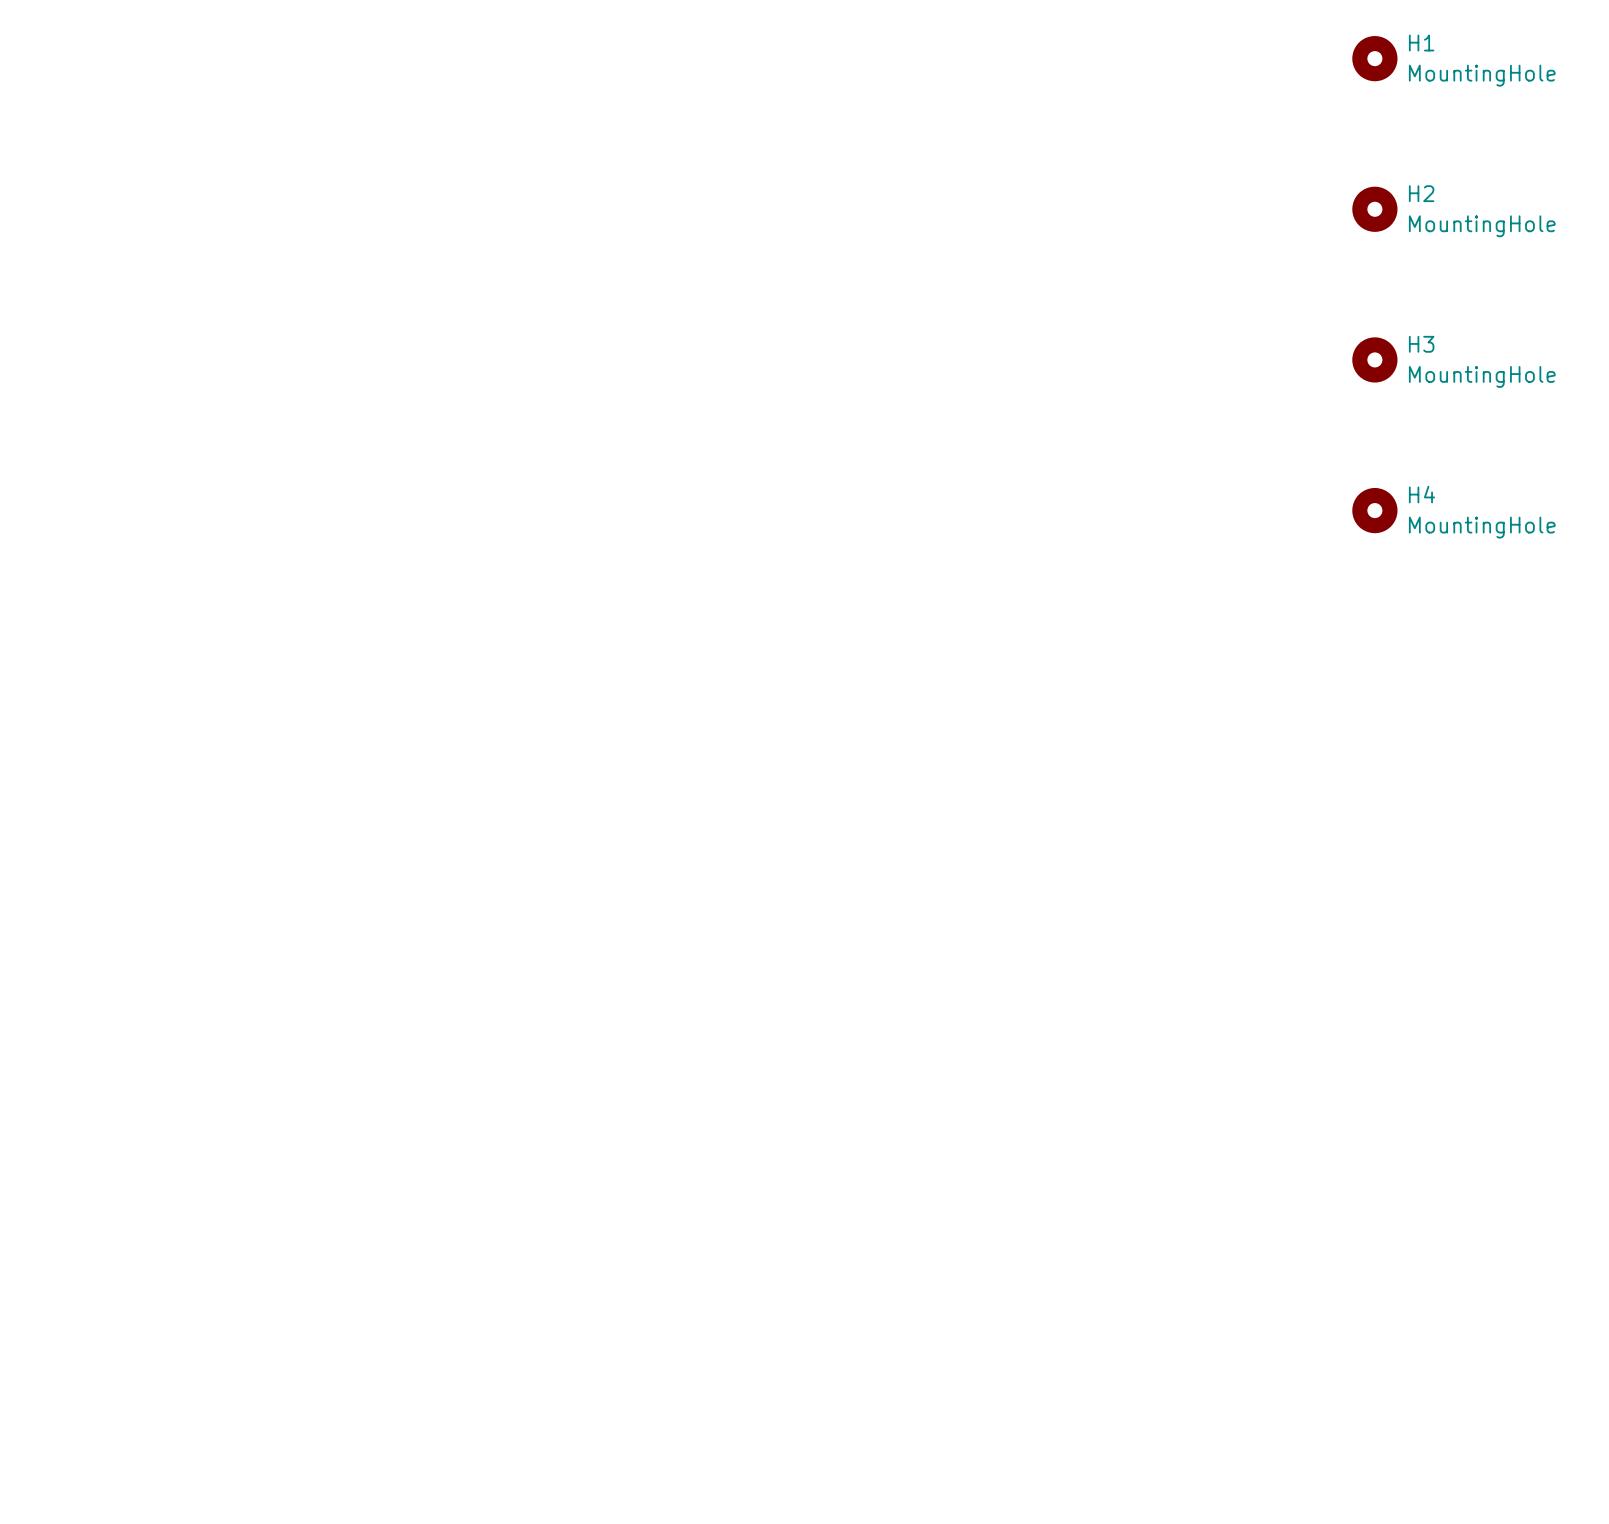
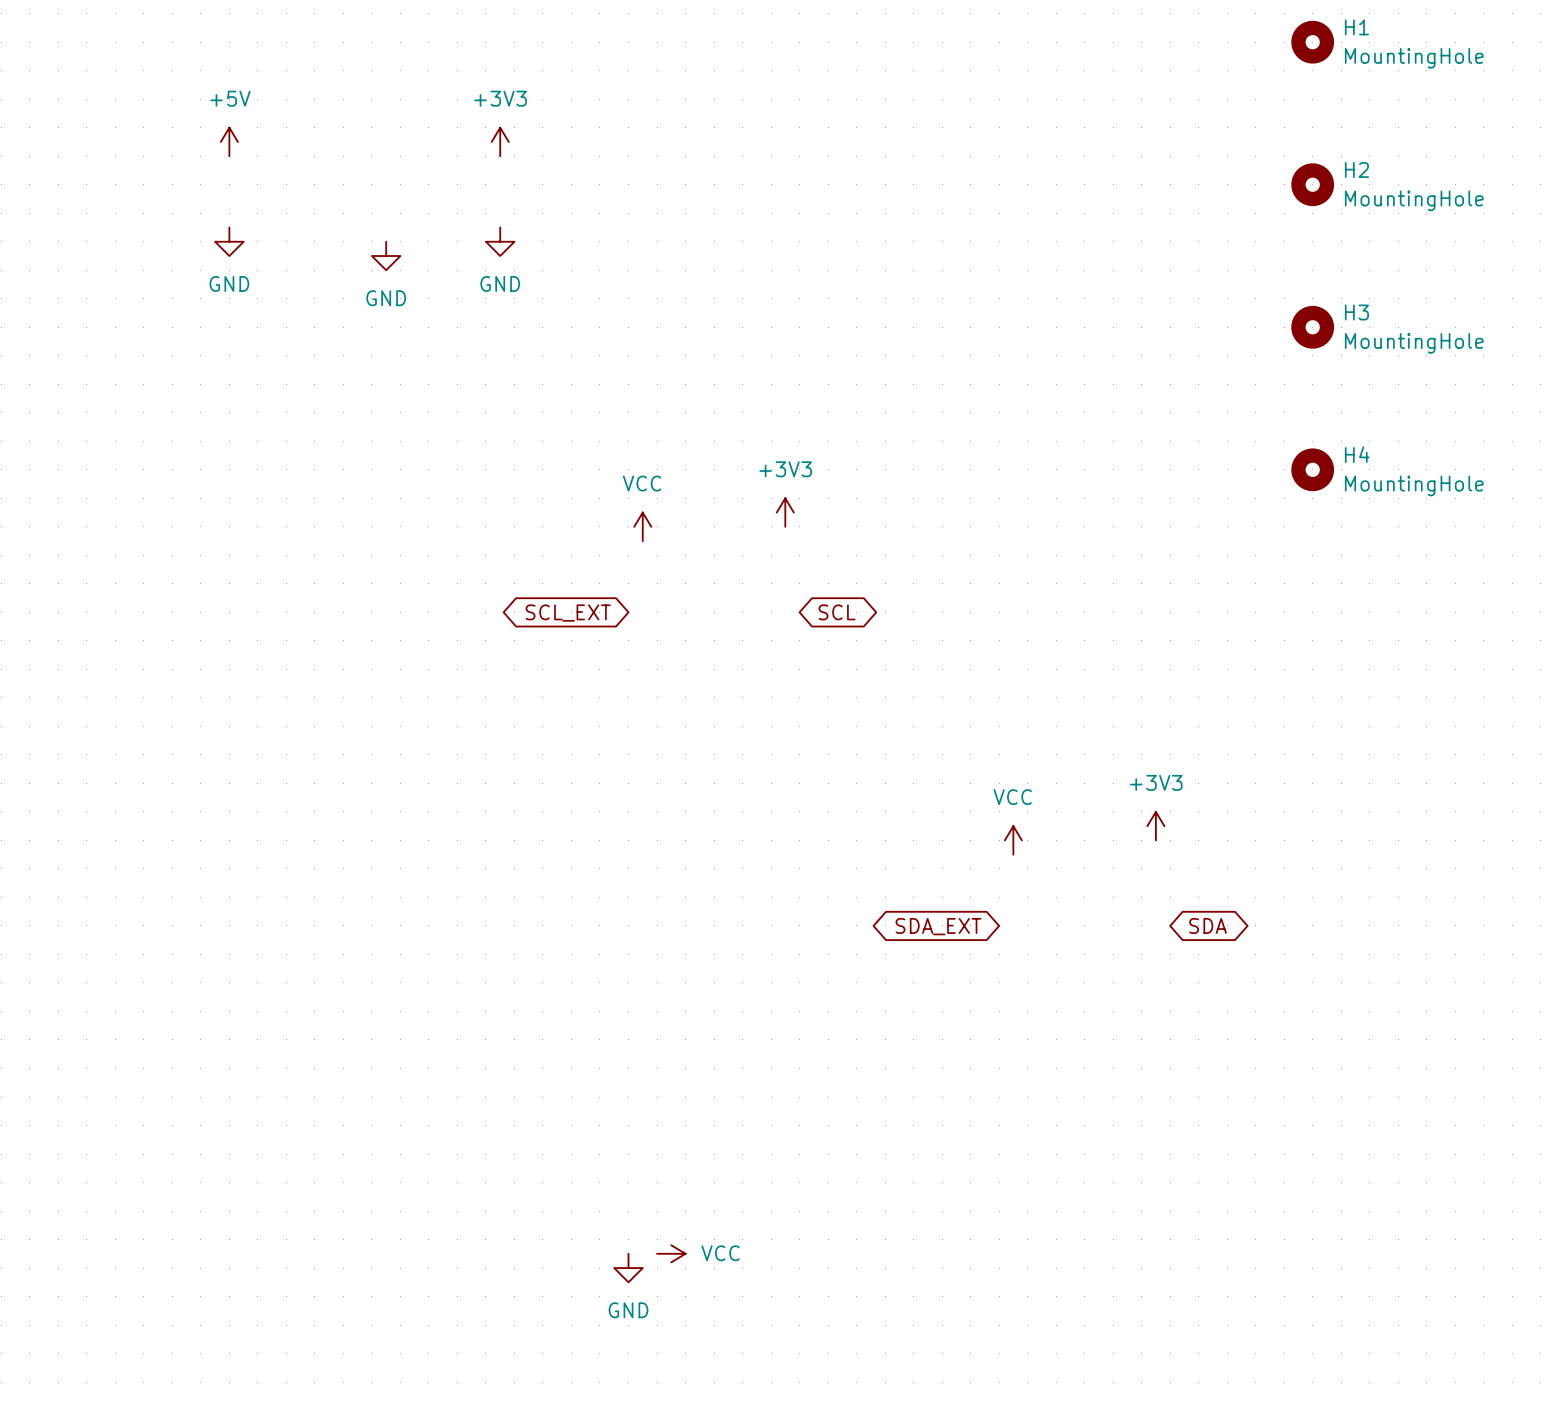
power symbol: none -> +5V (229, 141)
power symbol: none -> +3V3 (500, 141)
power symbol: none -> GND (229, 241)
power symbol: none -> GND (500, 241)
power symbol: none -> GND (386, 256)
power symbol: none -> +3V3 (785, 512)
power symbol: none -> VCC (642, 526)
global label: none -> SCL_EXT (568, 613)
global label: none -> SCL (837, 612)
power symbol: none -> +3V3 (1155, 826)
power symbol: none -> VCC (1013, 840)
global label: none -> SDA (1208, 925)
global label: none -> SDA_EXT (938, 926)
power symbol: none -> VCC (671, 1253)
power symbol: none -> GND (628, 1268)

